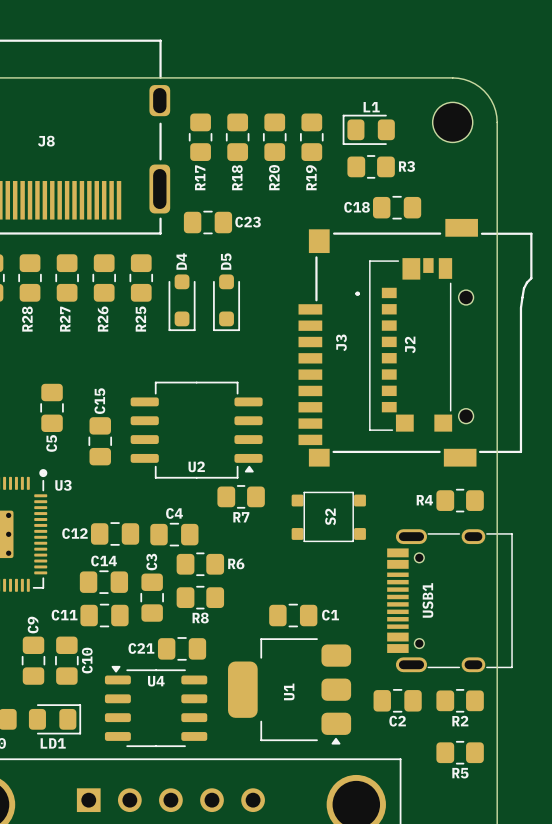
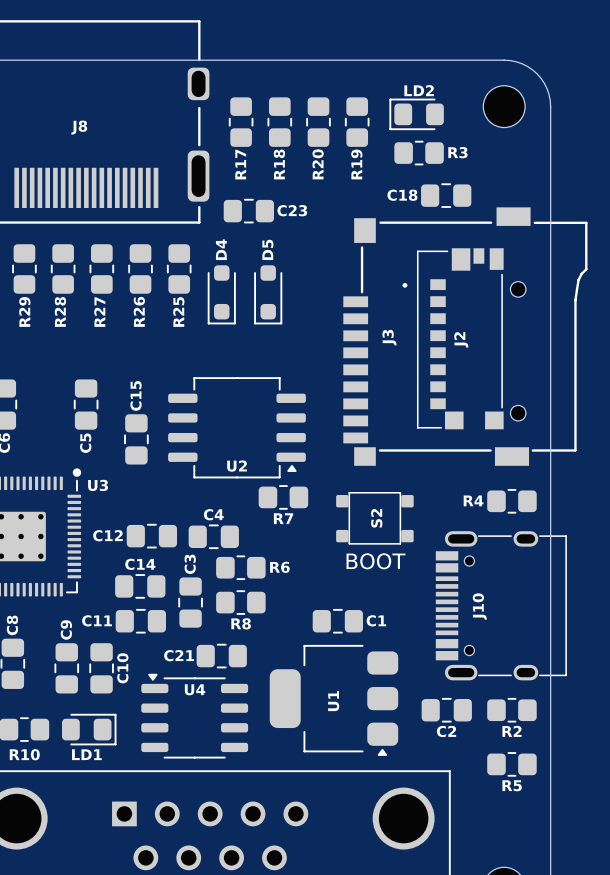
L1 name: L1 (371, 107) -> LD2 (419, 90)
text: none -> BOOT (375, 561)
USB1 name: USB1 (427, 600) -> J10 (479, 606)

